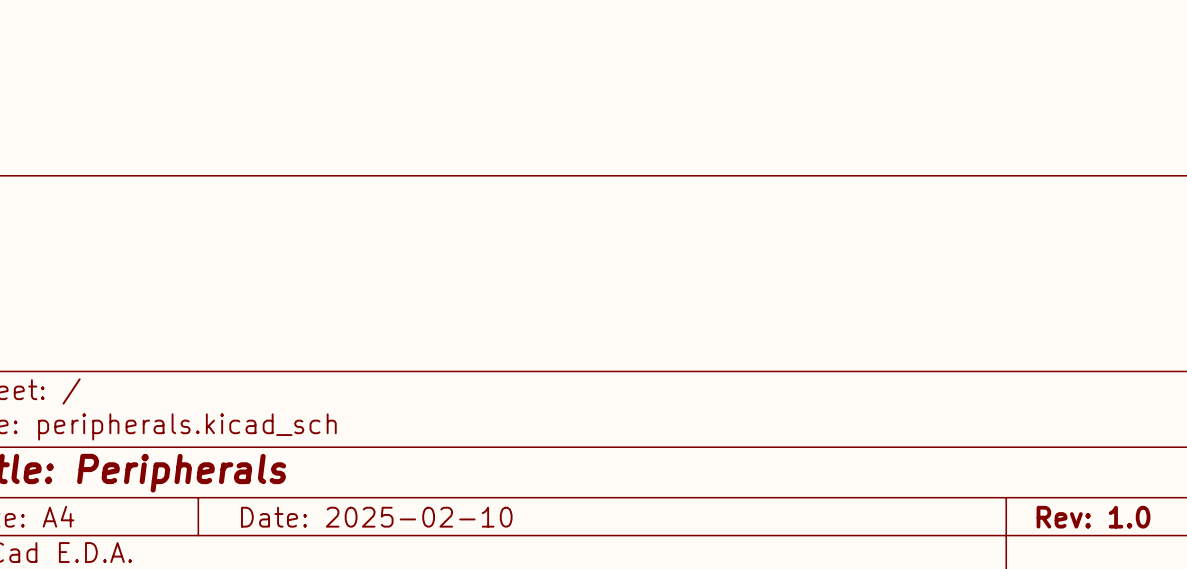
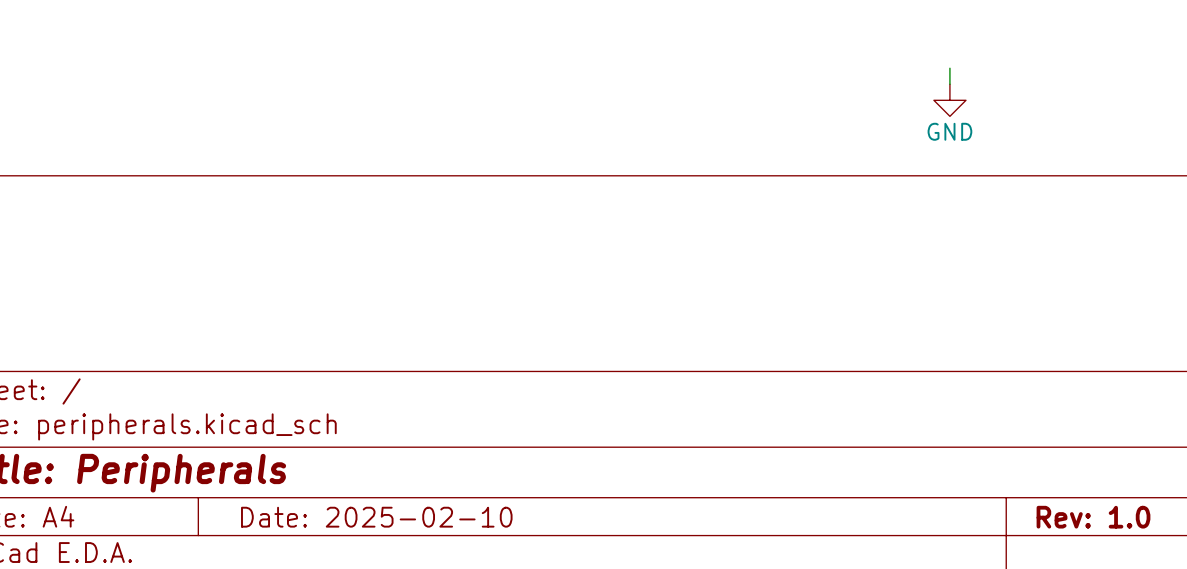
wire: none -> (949, 68) (949, 84)
power symbol: none -> GND (949, 100)

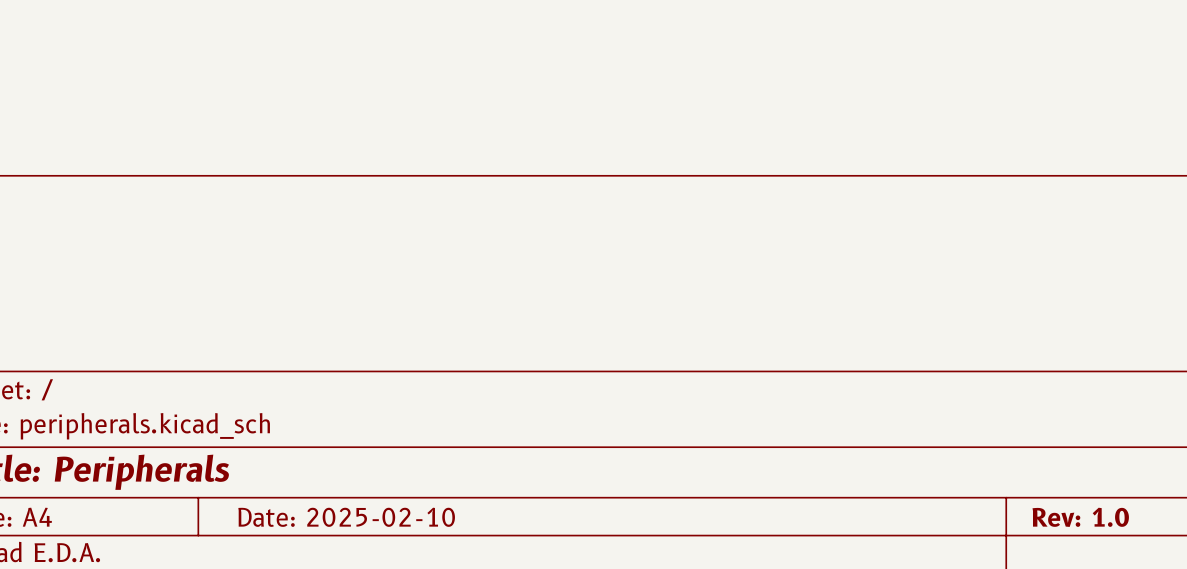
wire: (949, 68) (949, 84) -> none
power symbol: GND (949, 100) -> none

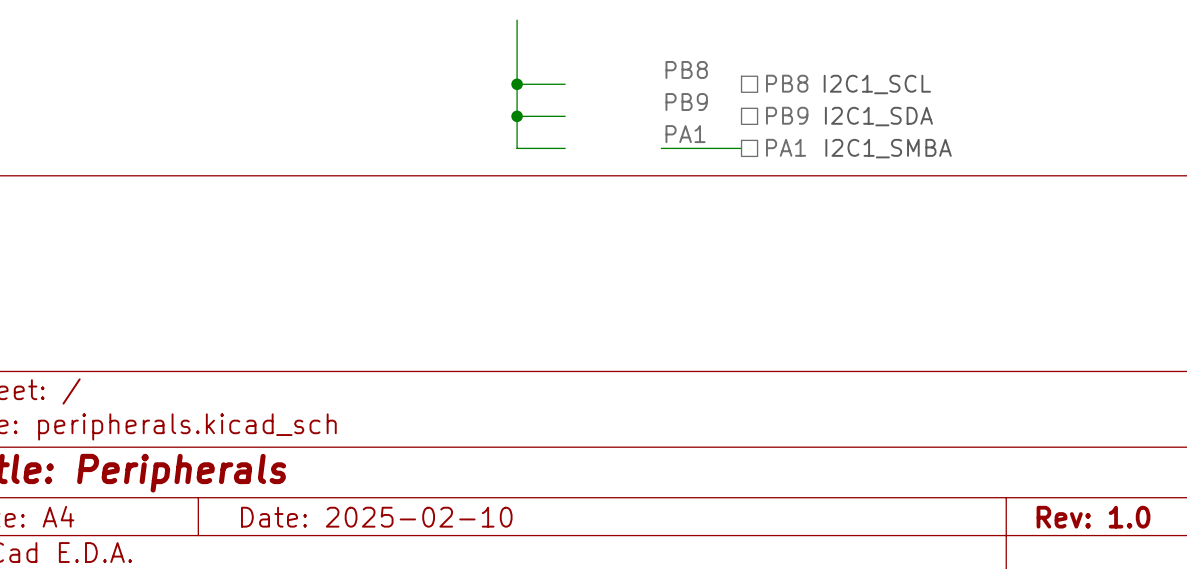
wire: none -> (517, 20) (517, 148) (565, 148)
label: none -> PB8 (686, 69)
hierarchical label: none -> PB8 (787, 83)
wire: none -> (517, 84) (565, 84)
junction: none -> (517, 84)
text: none -> I2C1_SCL (877, 84)
label: none -> PB9 (686, 102)
hierarchical label: none -> PB9 (787, 115)
wire: none -> (517, 116) (565, 116)
junction: none -> (517, 116)
text: none -> I2C1_SDA (878, 116)
label: none -> PA1 (685, 134)
hierarchical label: none -> PA1 (786, 147)
wire: none -> (661, 148) (741, 148)
text: none -> I2C1_SMBA (888, 148)

